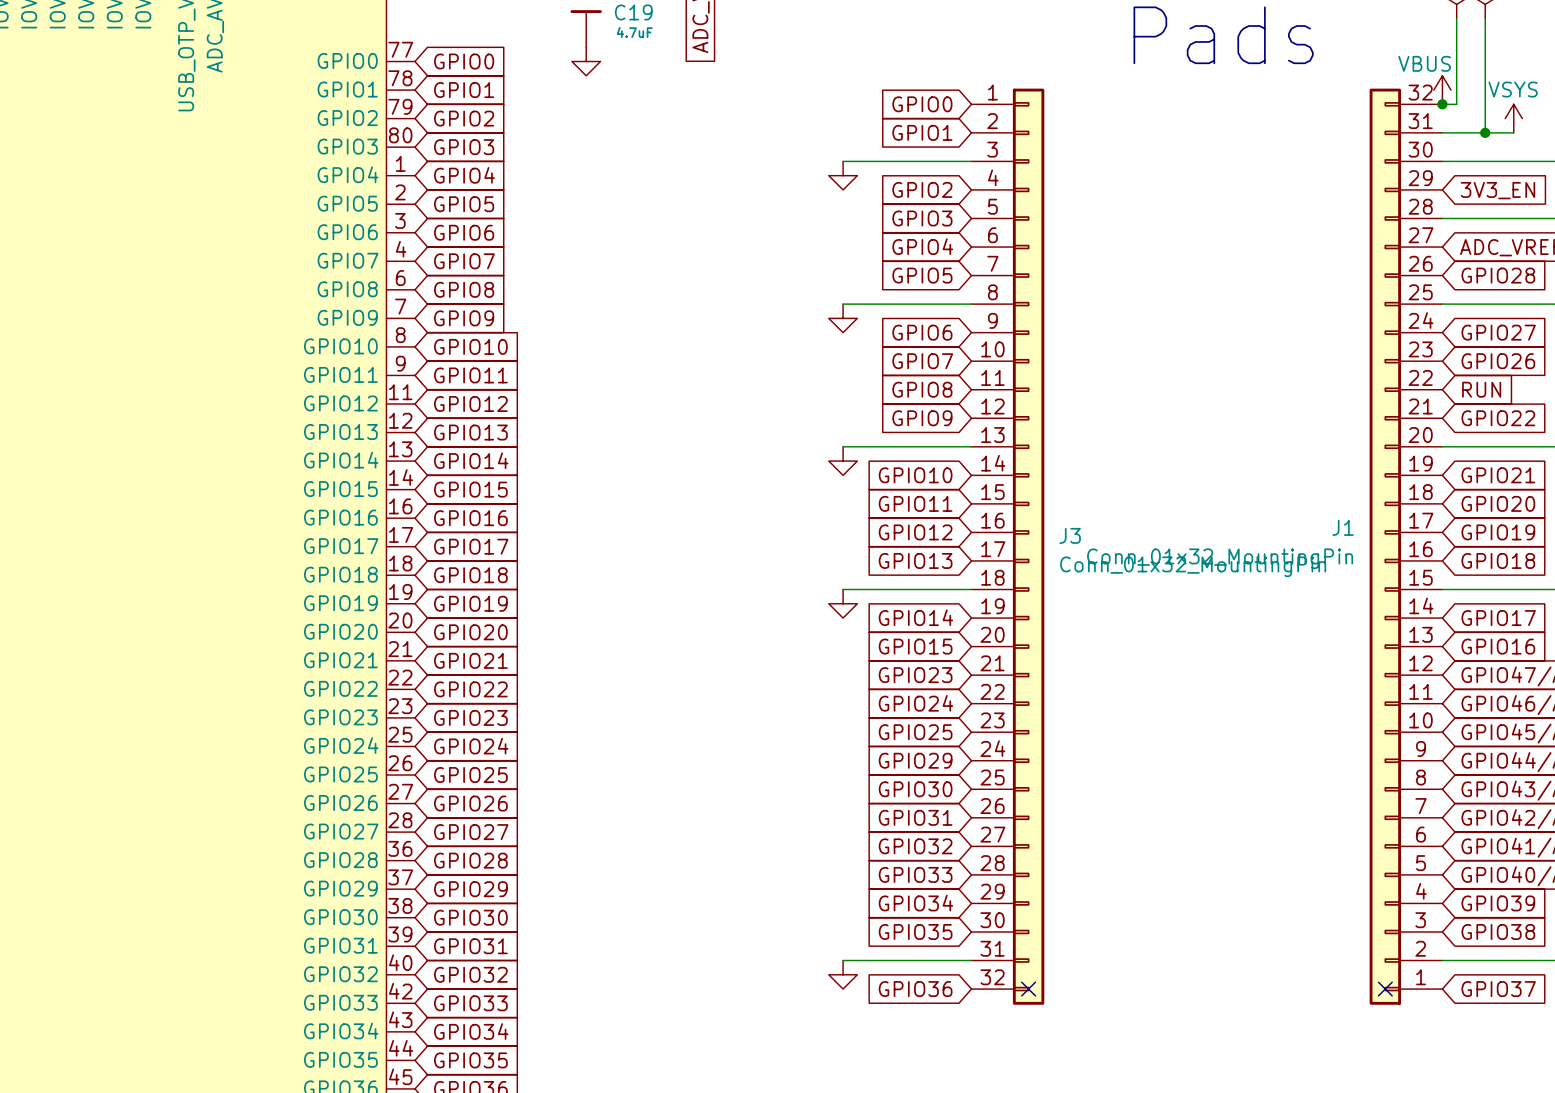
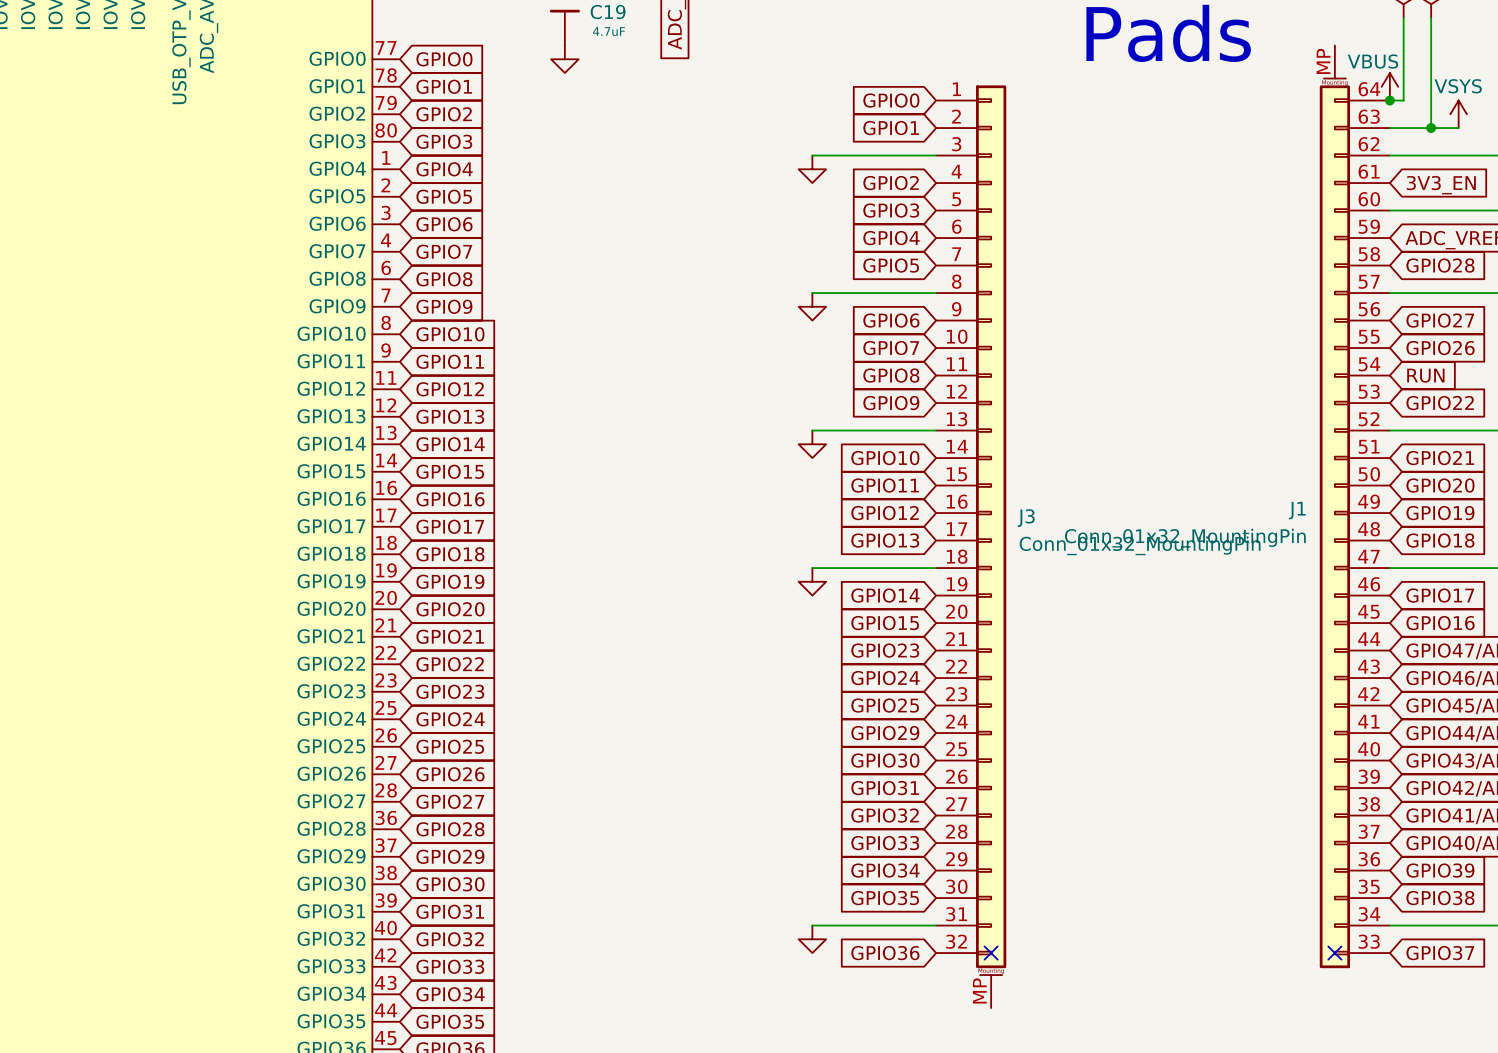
J3 symbol: [971, 88, 1045, 1005] -> [936, 85, 1007, 1009]
J1 symbol: [1369, 88, 1443, 1005] -> [1319, 45, 1390, 969]

